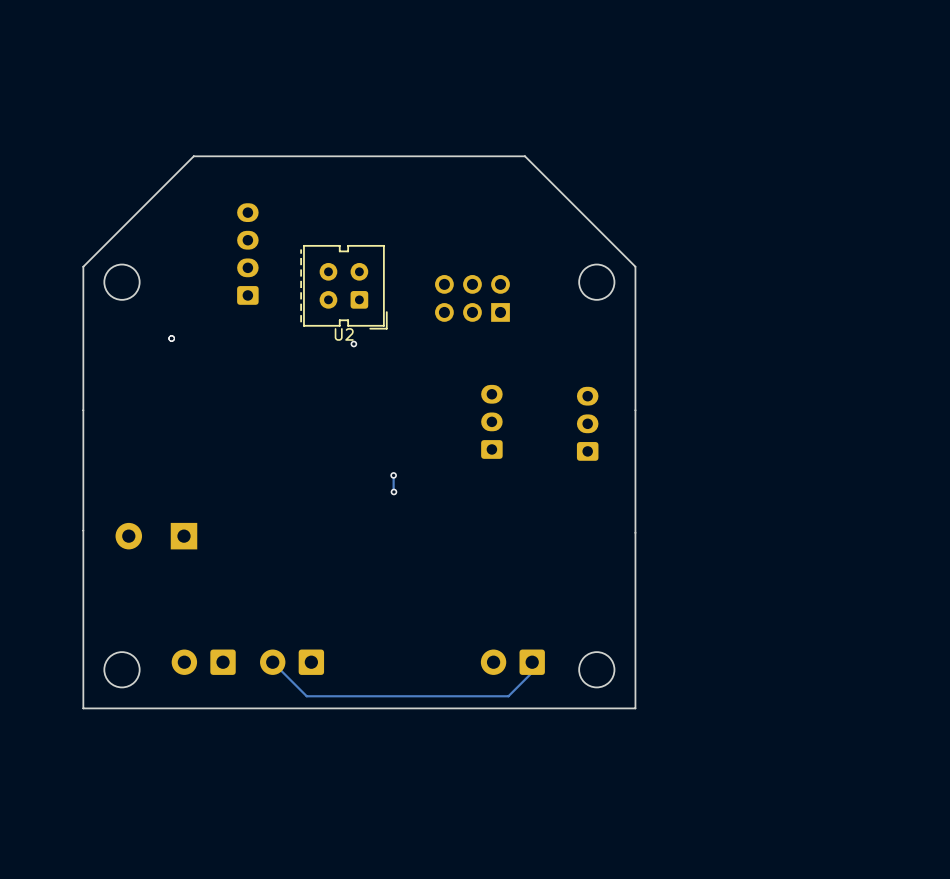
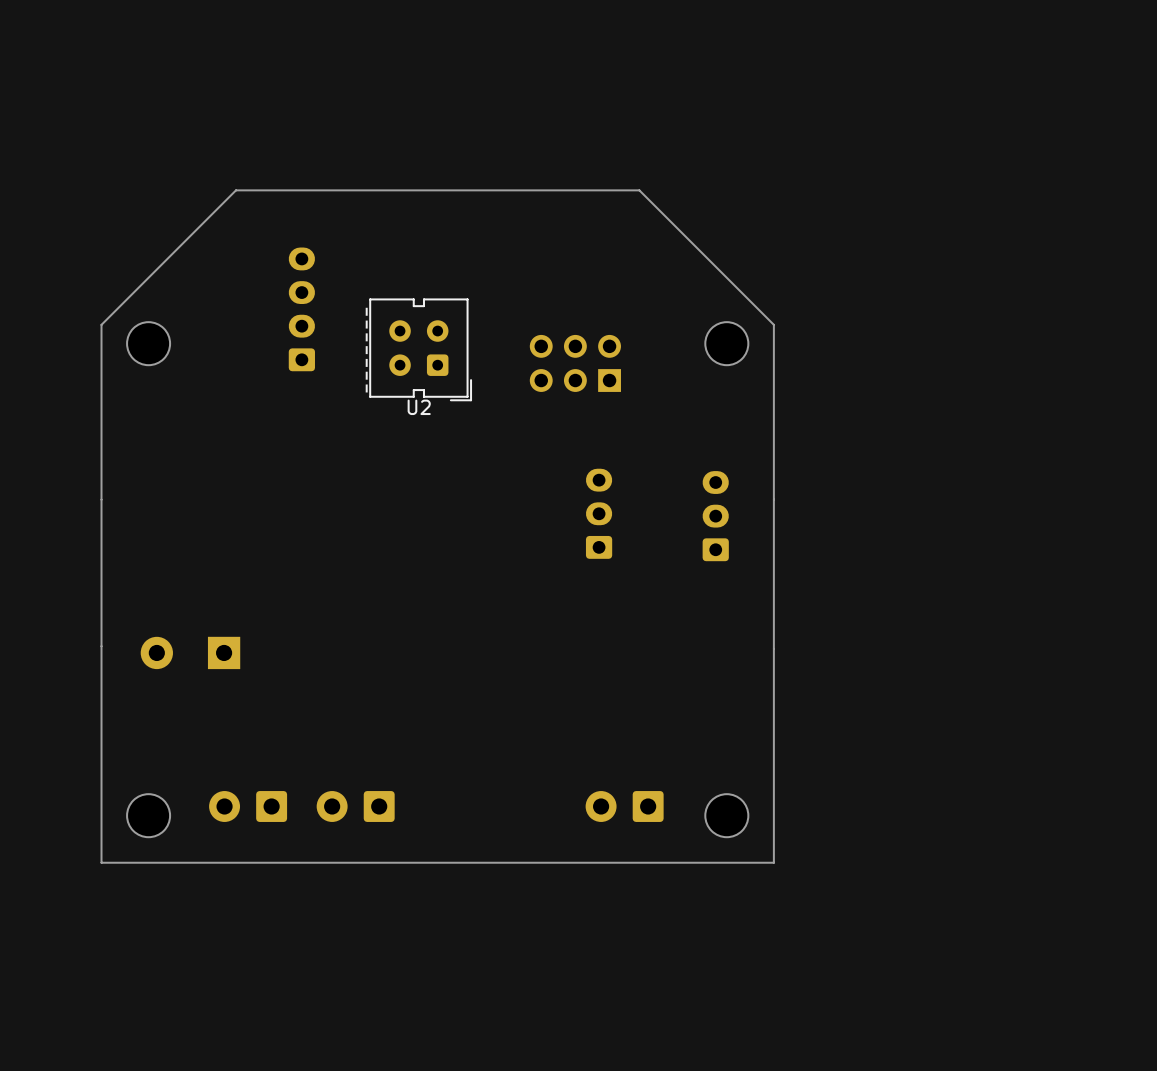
via: (171, 338) -> none
via: (353, 344) -> none
track: (393, 475) (393, 491) -> none
via: (393, 475) -> none
via: (393, 491) -> none
track: (532, 662) (532, 672) (508, 696) (306, 696) (272, 662) -> none

